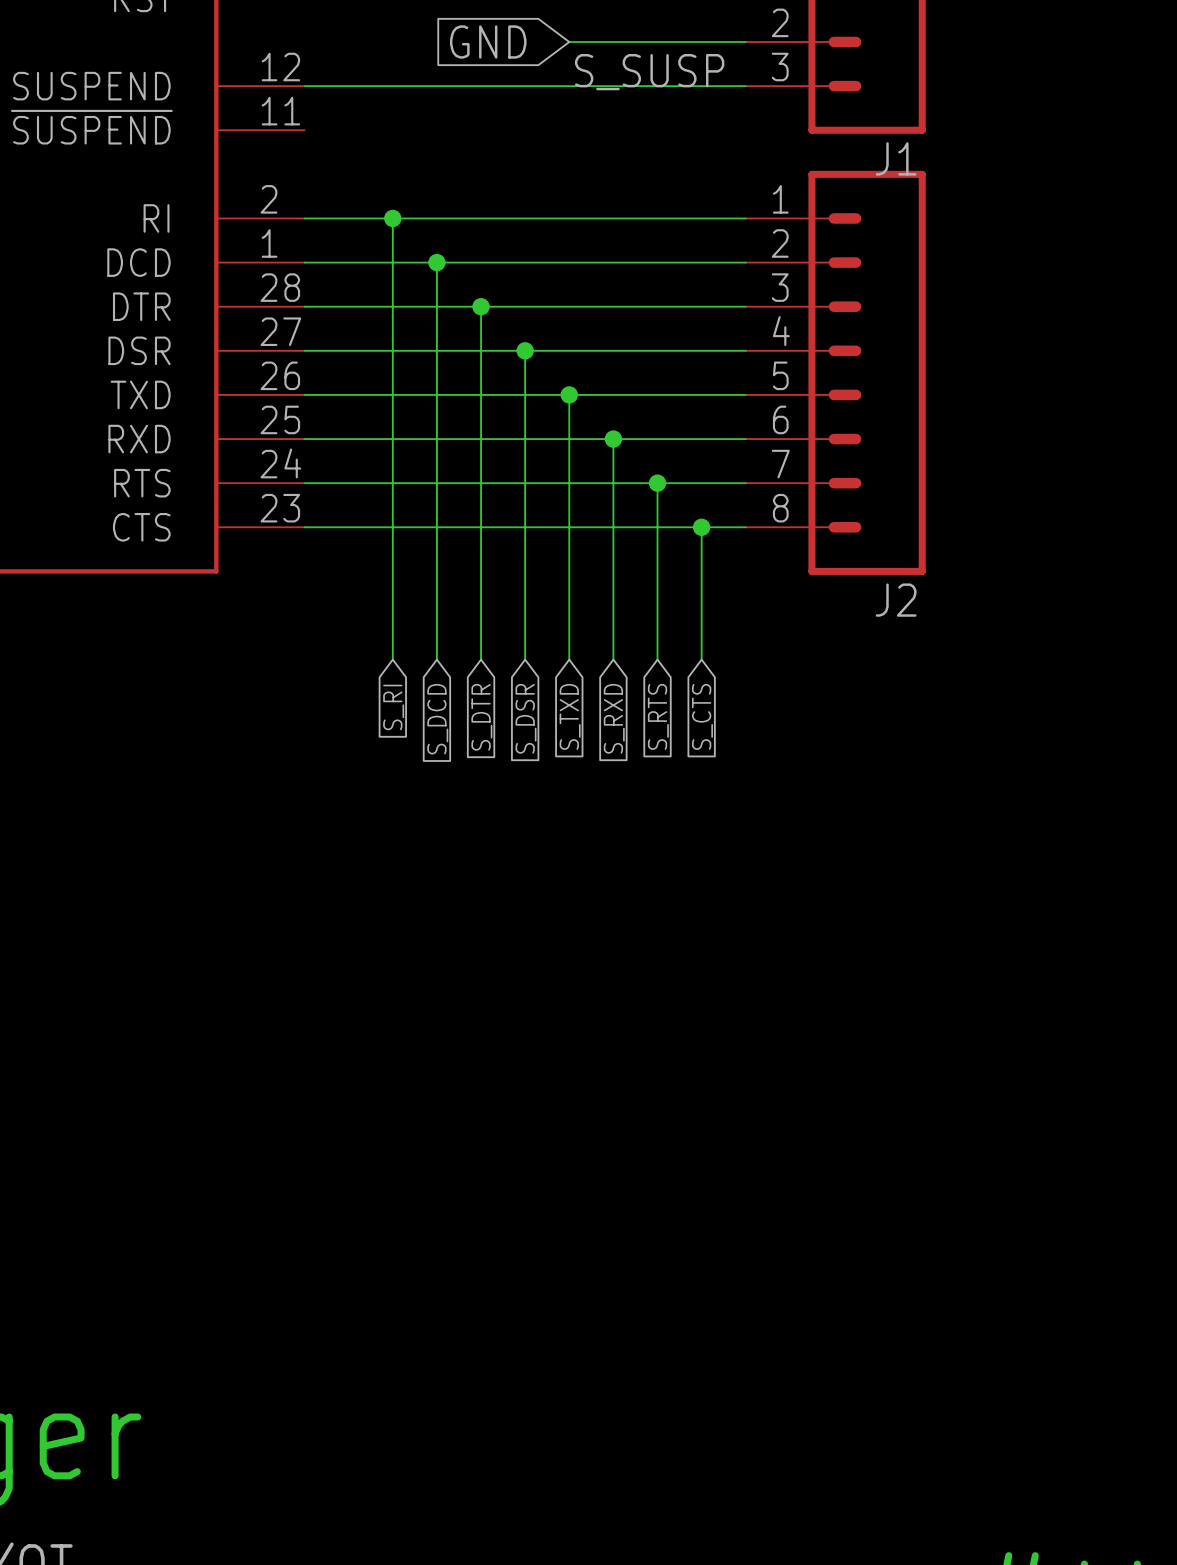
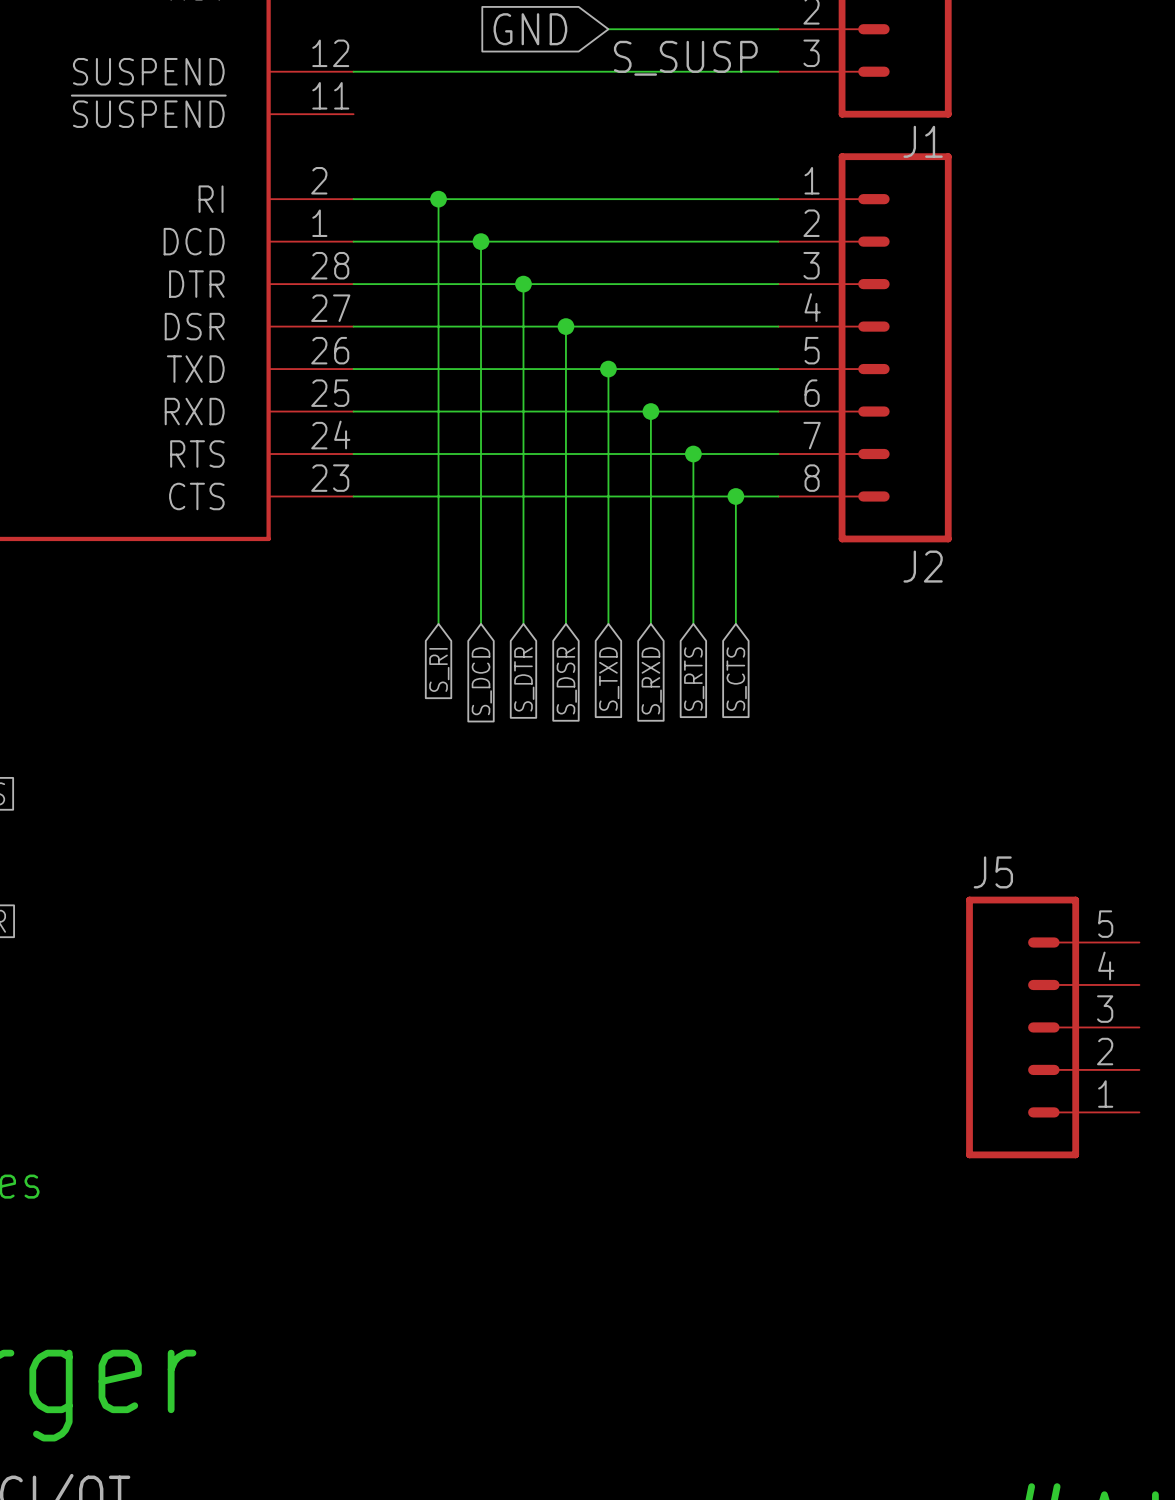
J5: none -> (1052, 1027)

